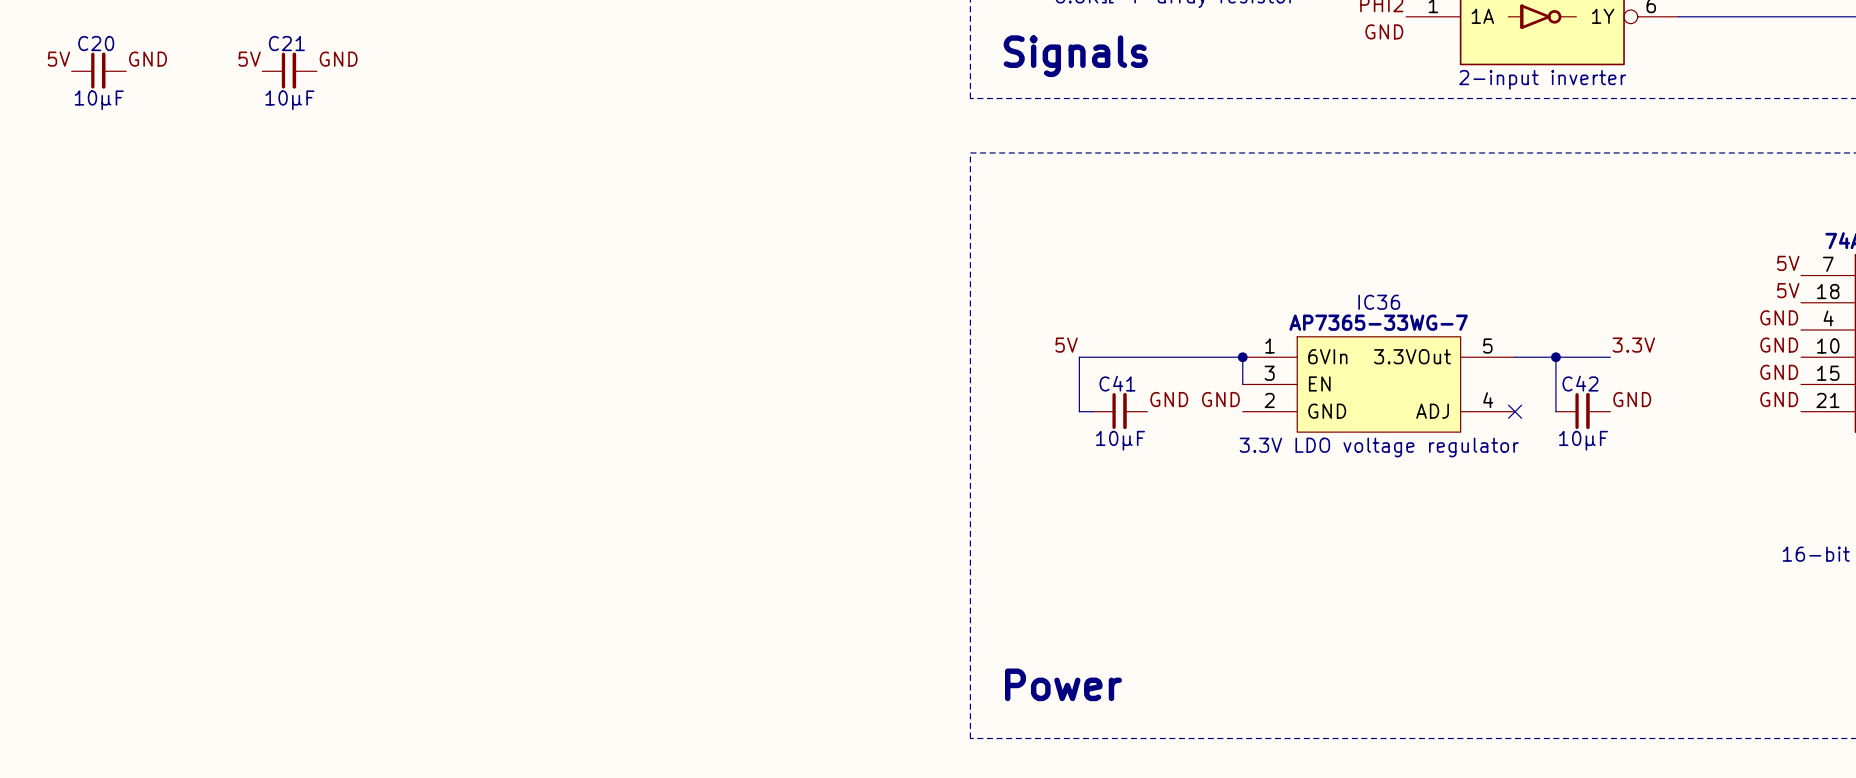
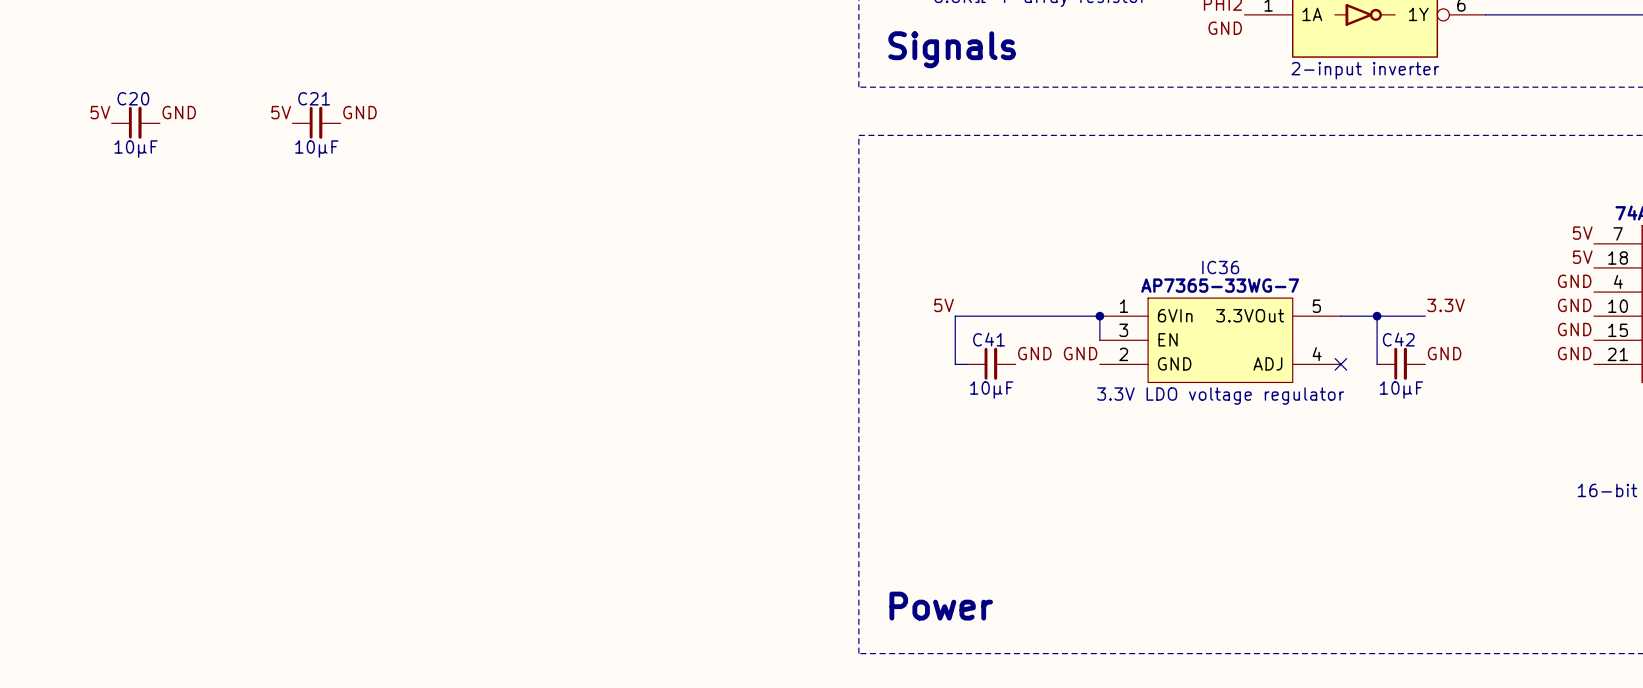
label: 5V (58, 59) -> none
label: GND (148, 59) -> none
label: 5V (249, 59) -> none
label: GND (338, 59) -> none
C20 position: (98, 70) -> (135, 122)
C21 position: (289, 70) -> (316, 122)
label: none -> 5V (100, 112)
label: none -> GND (179, 112)
label: none -> 5V (281, 112)
label: none -> GND (359, 112)

